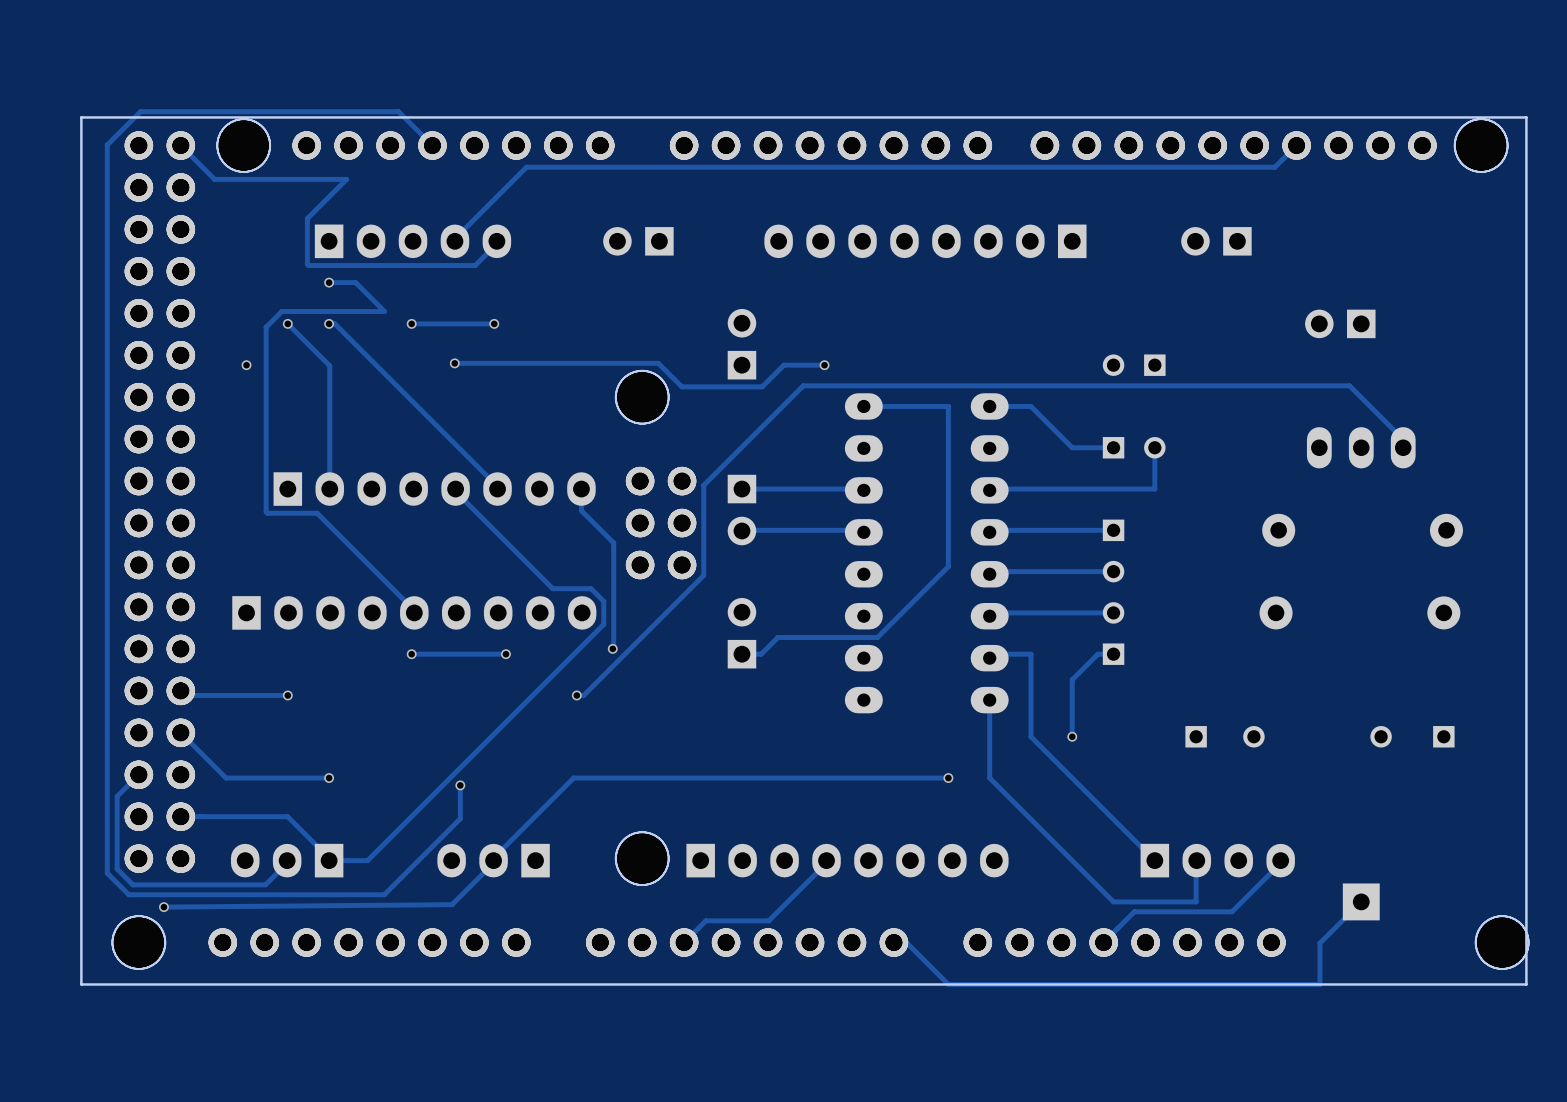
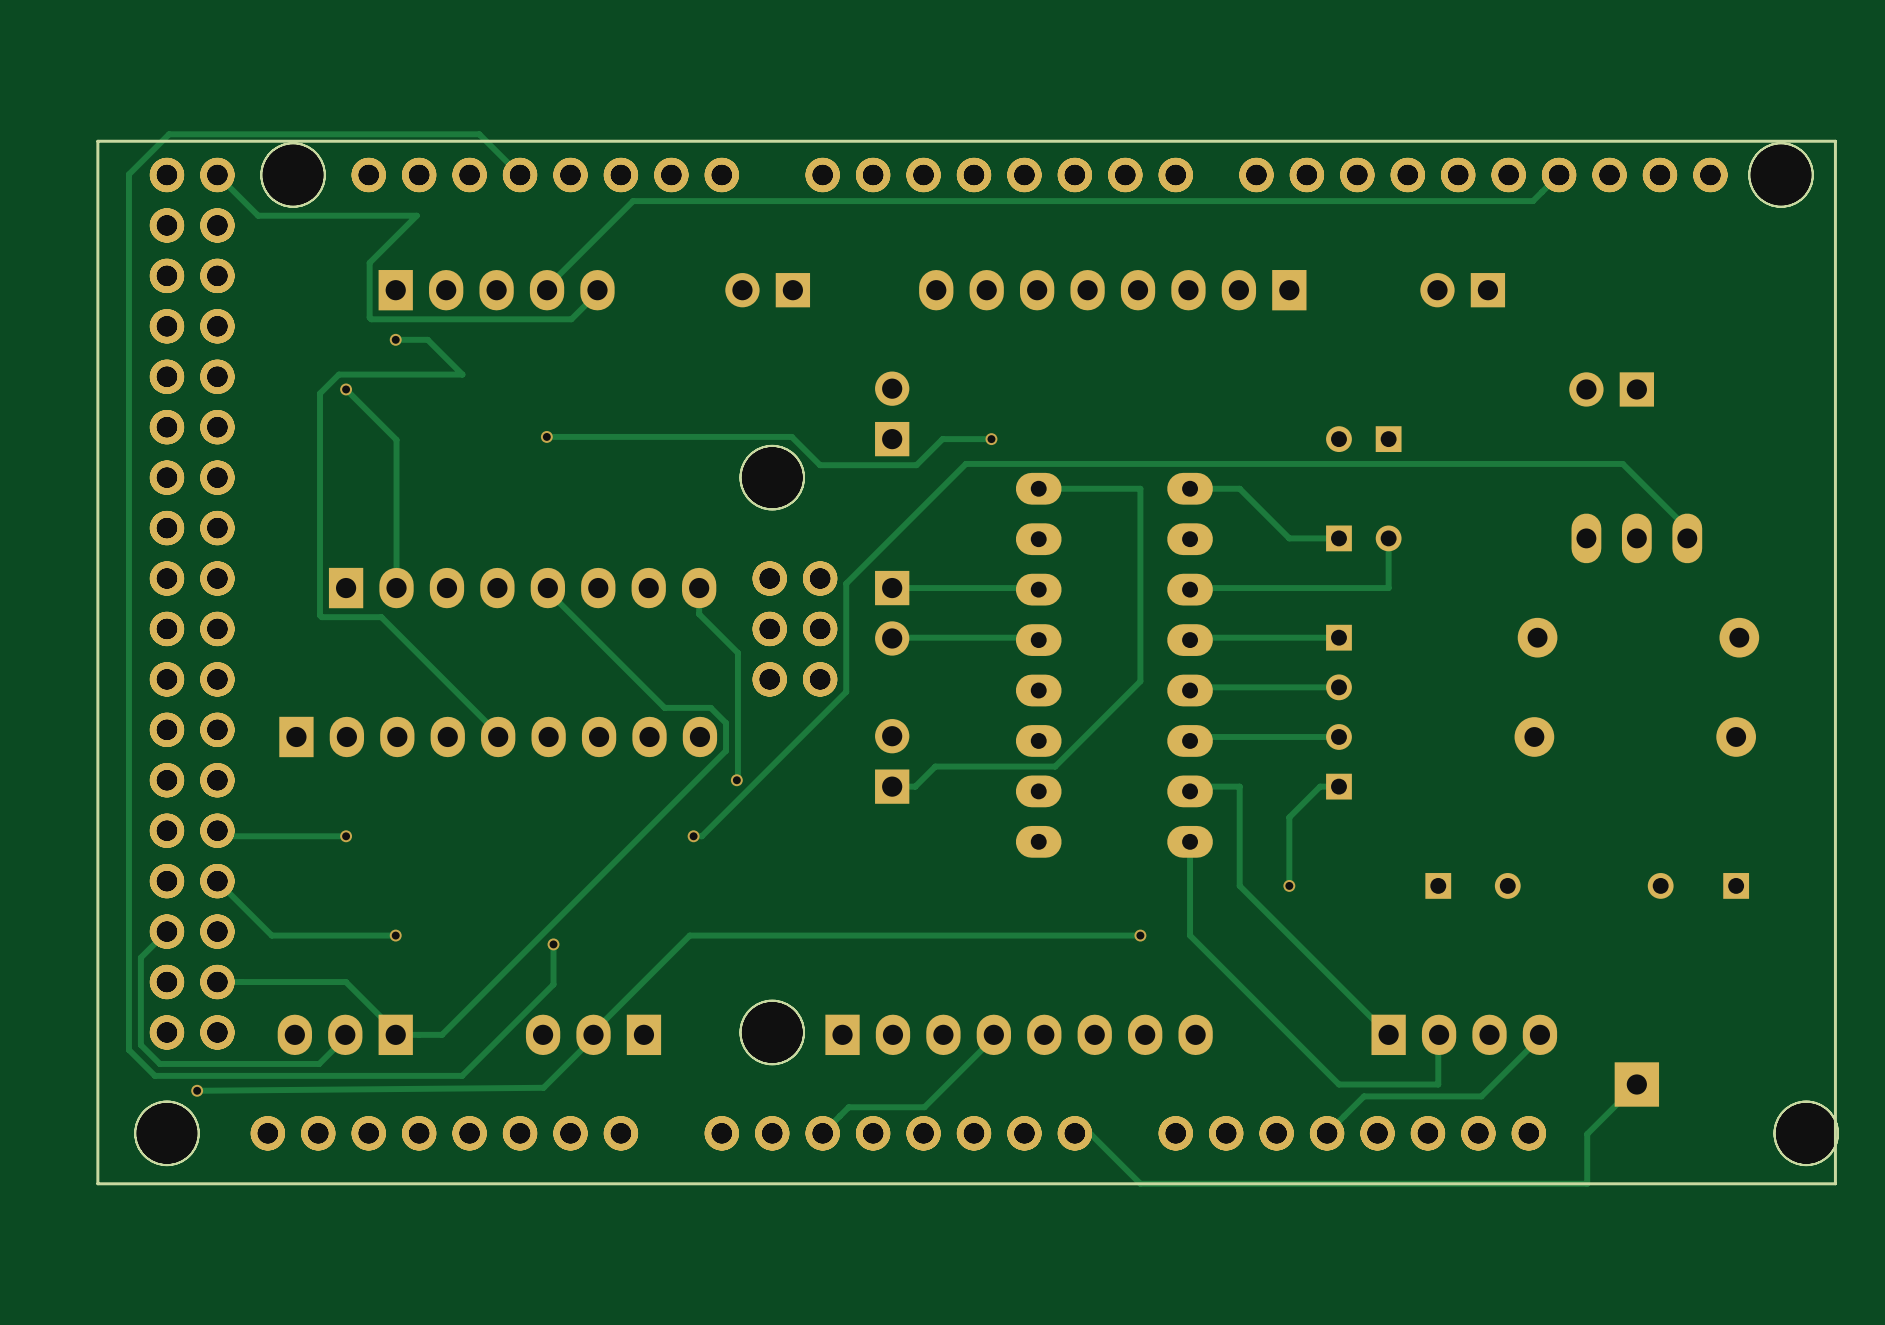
track: (329, 323) (334, 323) (497, 486) (497, 489) -> none
via: (329, 323) -> none
via: (411, 323) -> none
track: (494, 323) (411, 323) -> none
via: (494, 323) -> none
via: (246, 365) -> none
via: (411, 654) -> none
track: (505, 654) (411, 654) -> none
via: (505, 654) -> none

